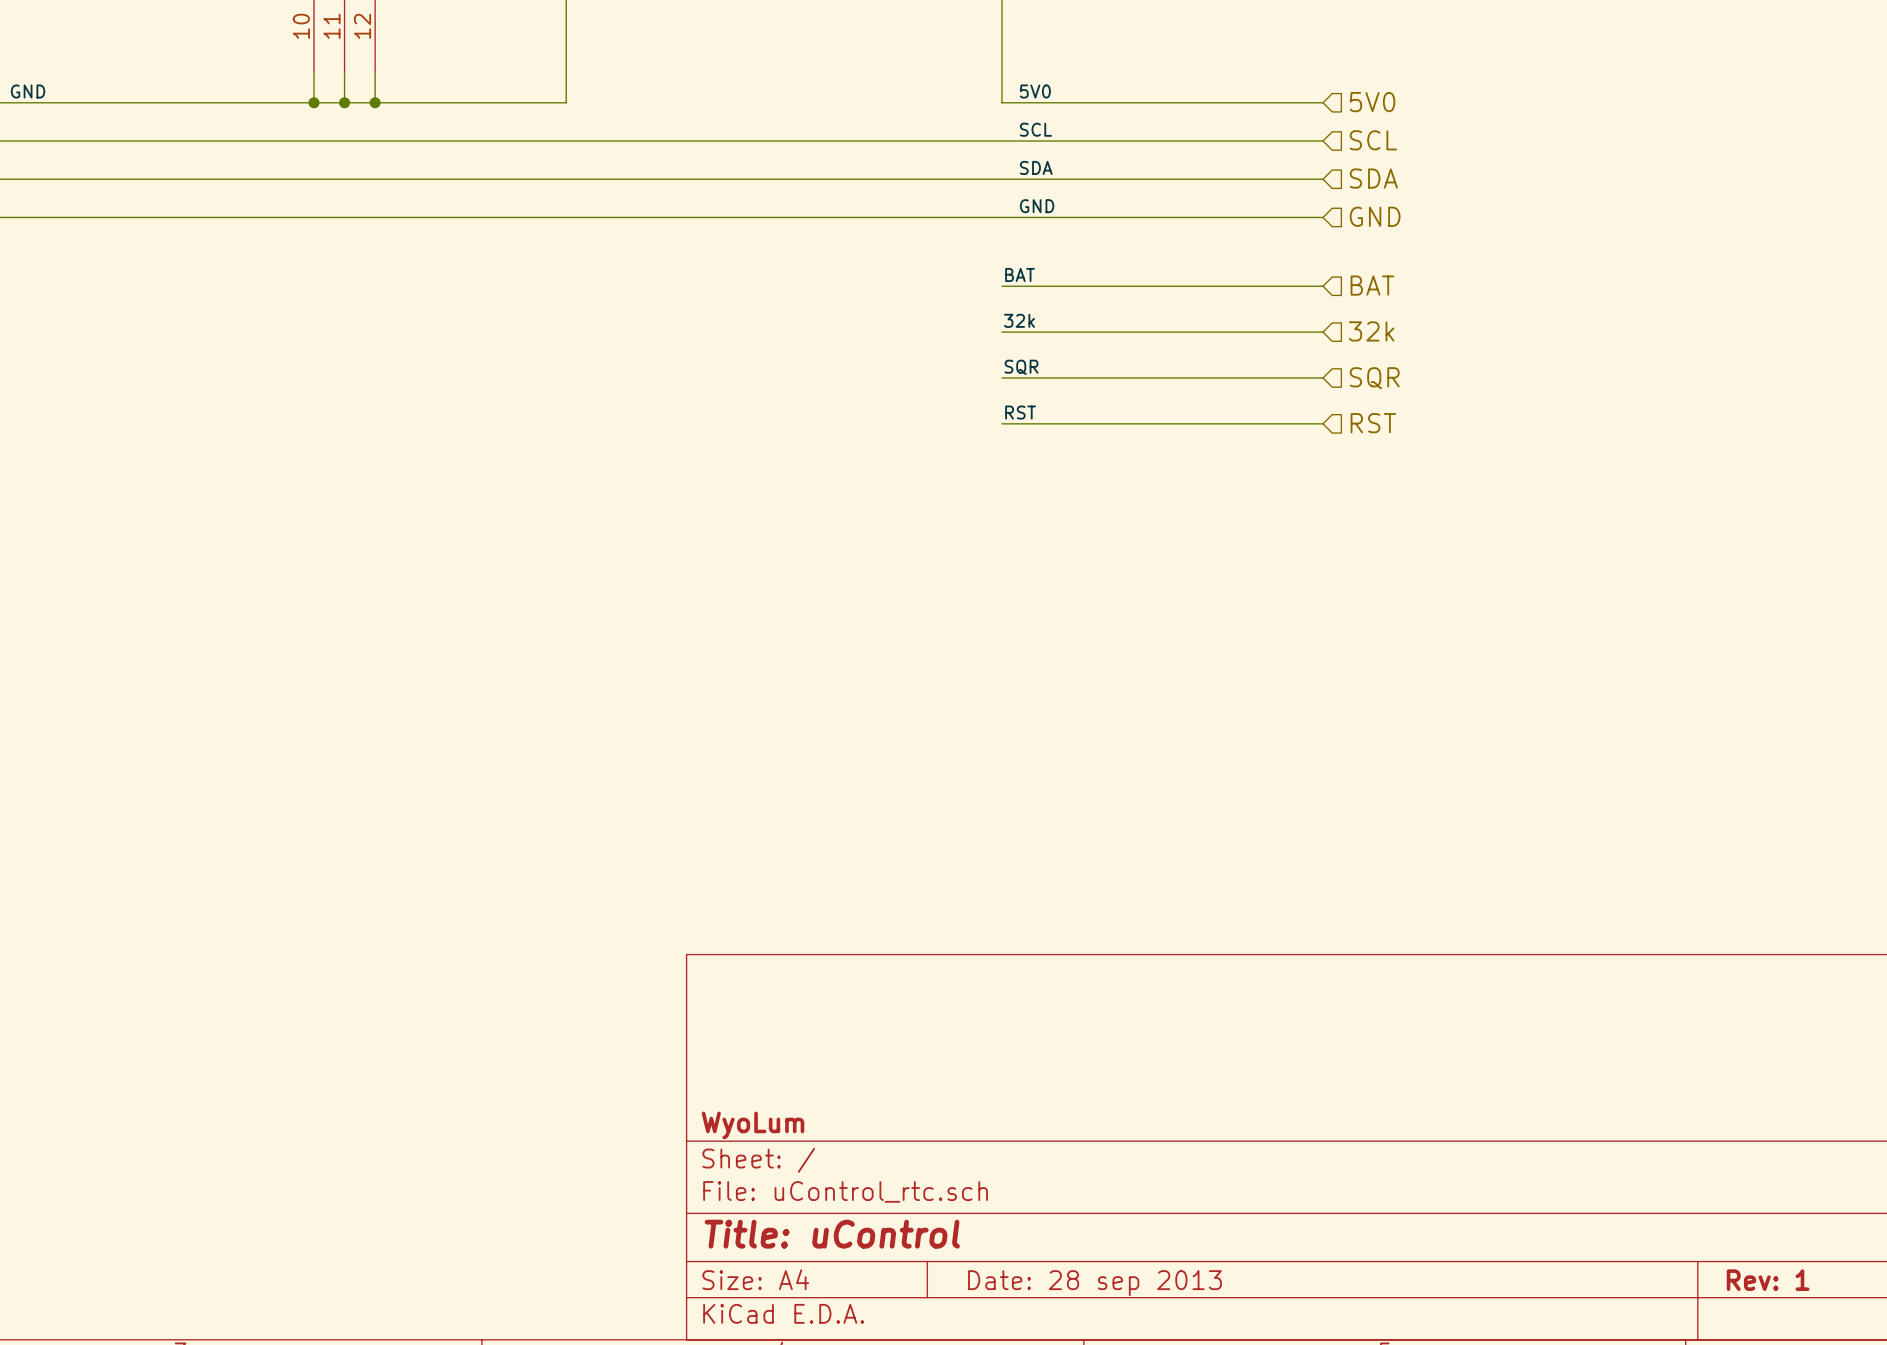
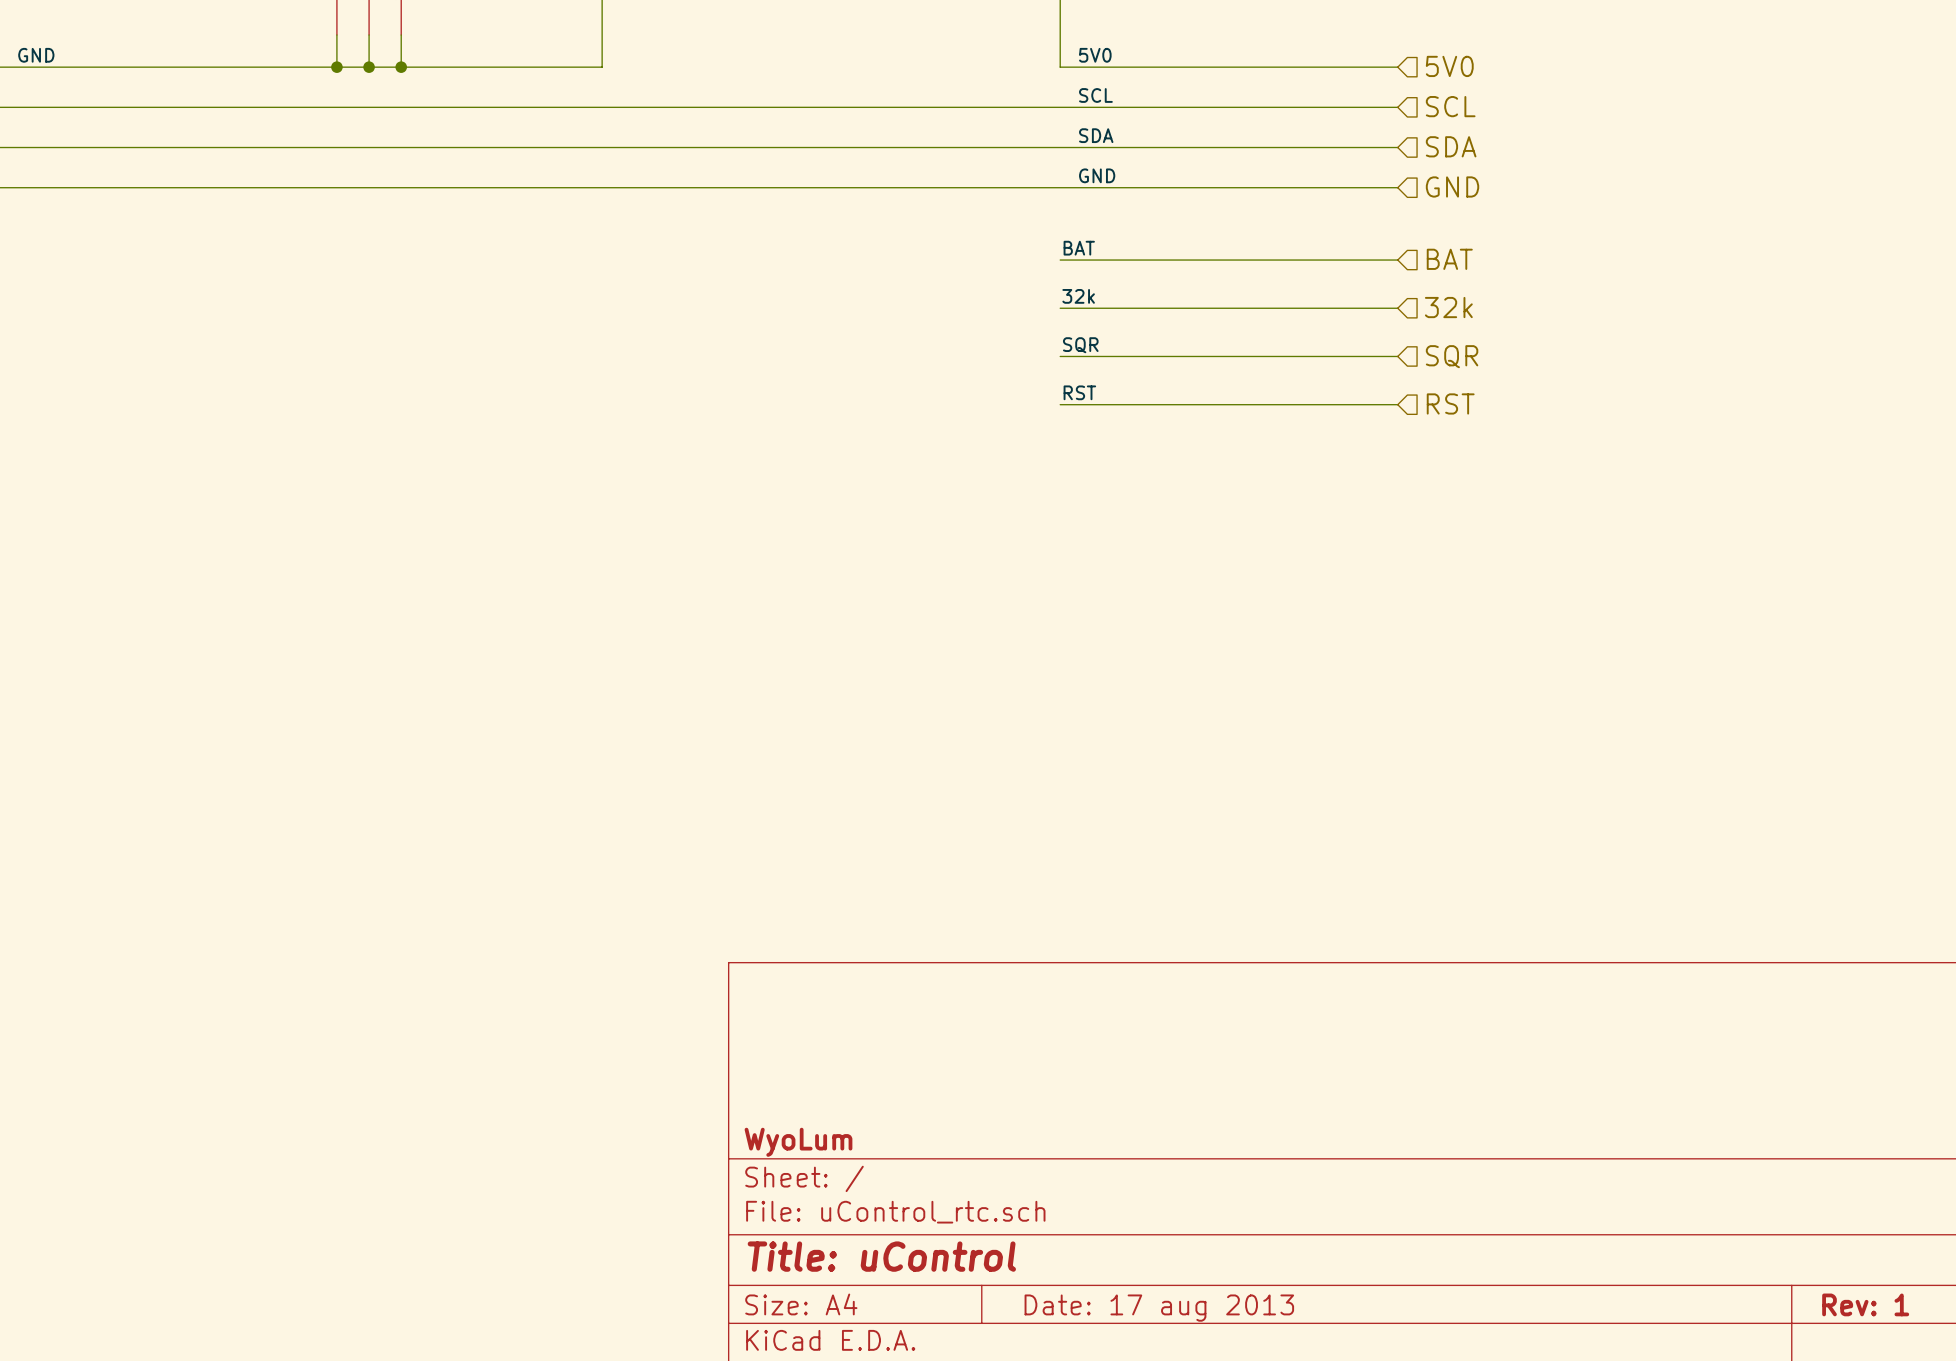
title block: Date: 28 sep 2013 (1094, 1283) -> Date: 17 aug 2013 (1159, 1308)

